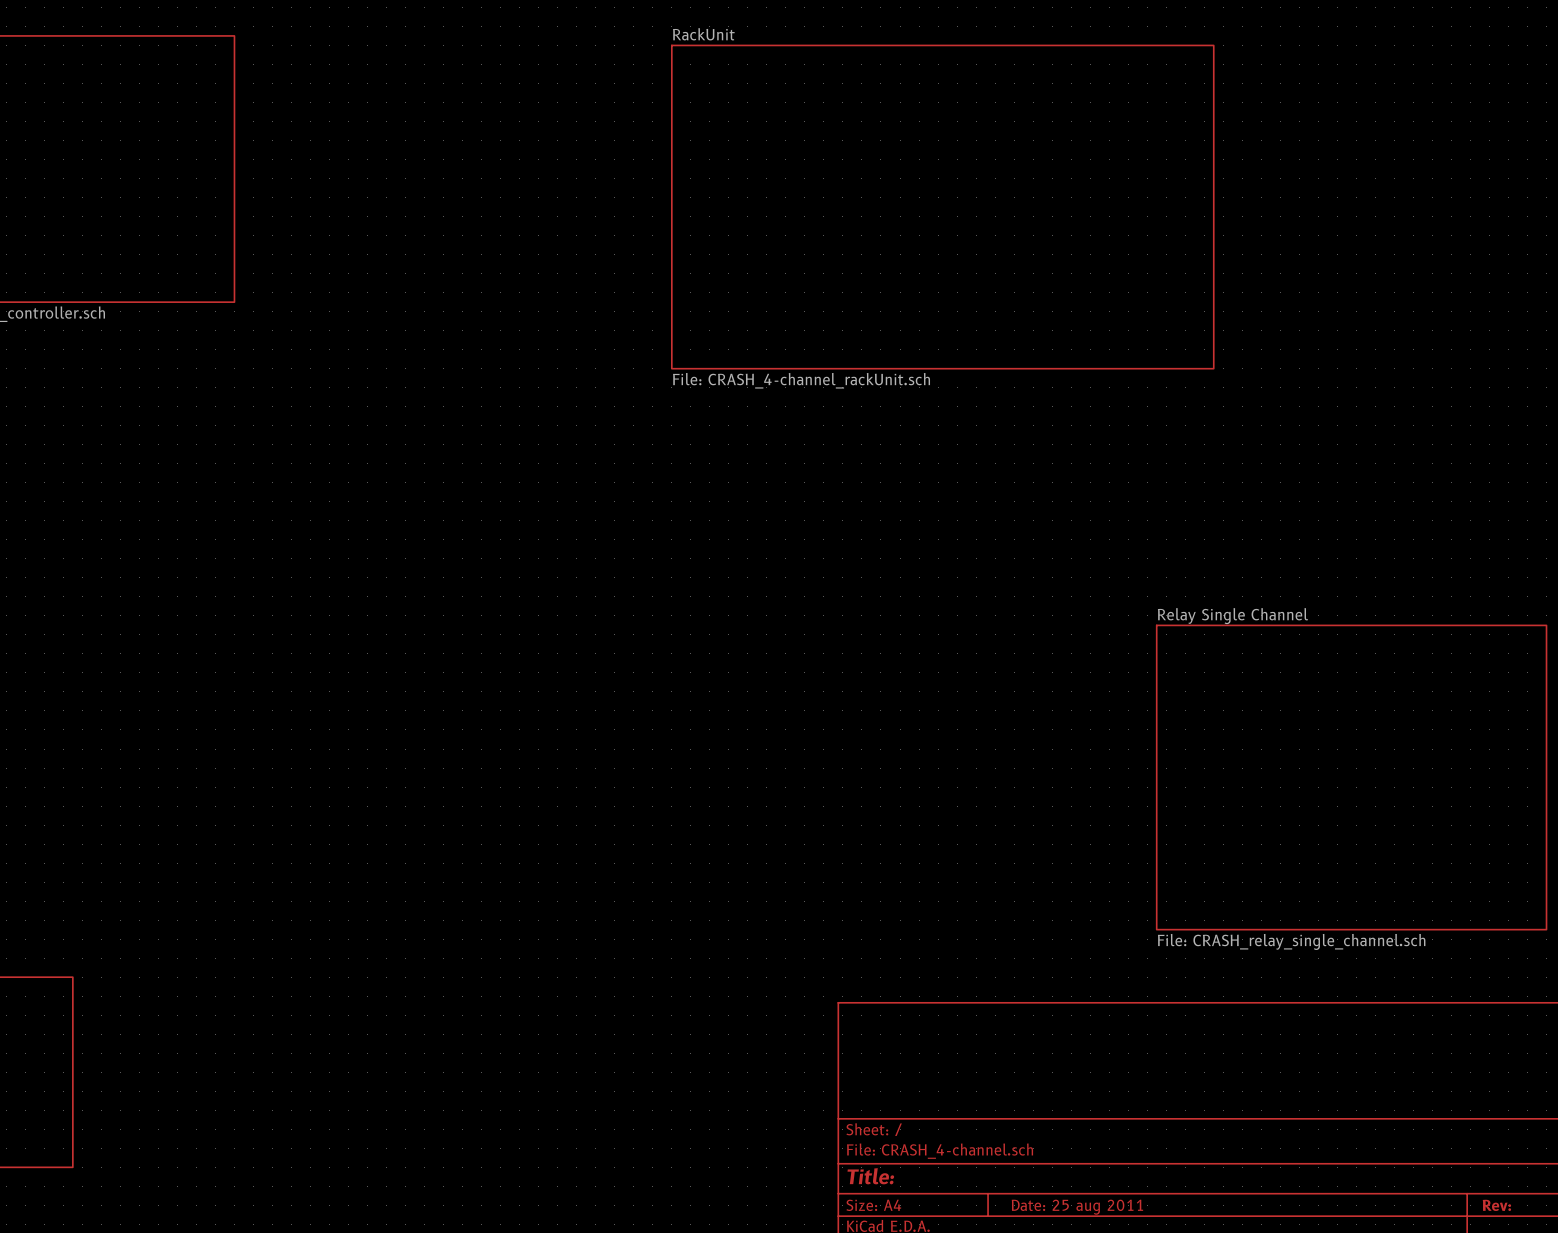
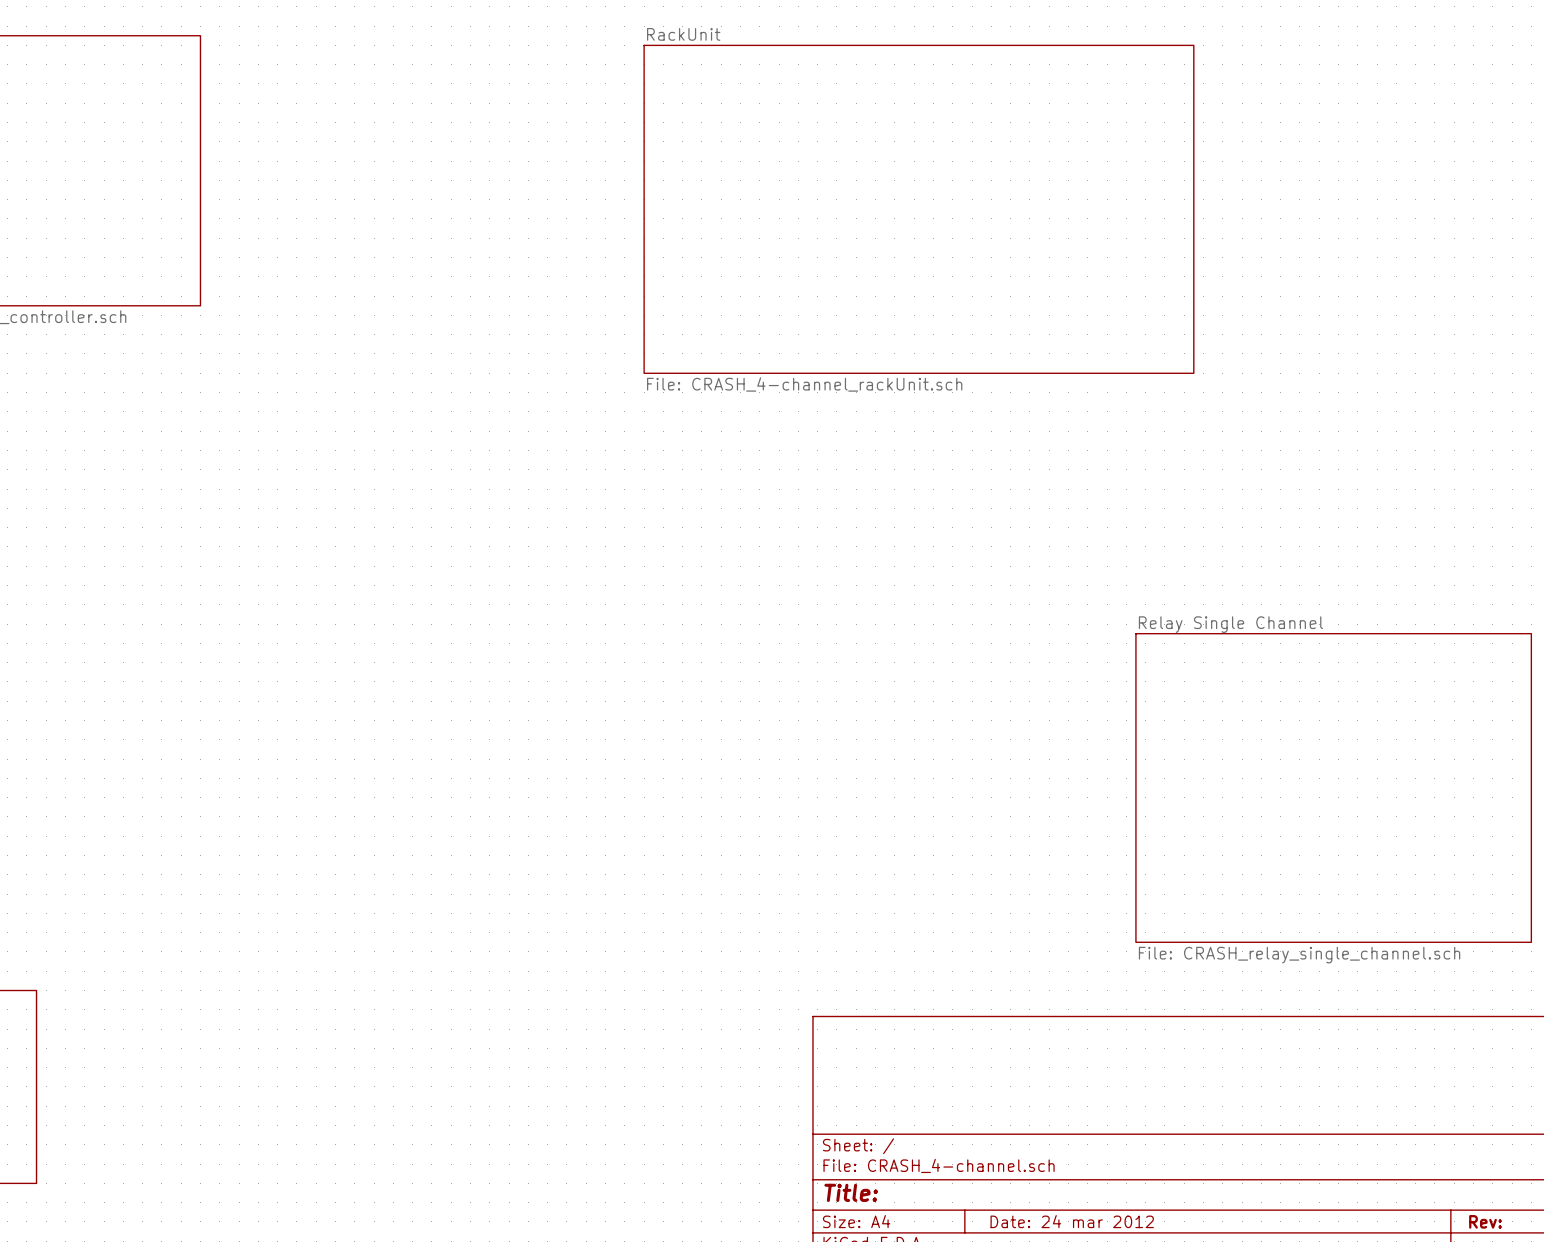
title block: Date: 25 aug 2011 (1077, 1207) -> Date: 24 mar 2012 (1072, 1221)

